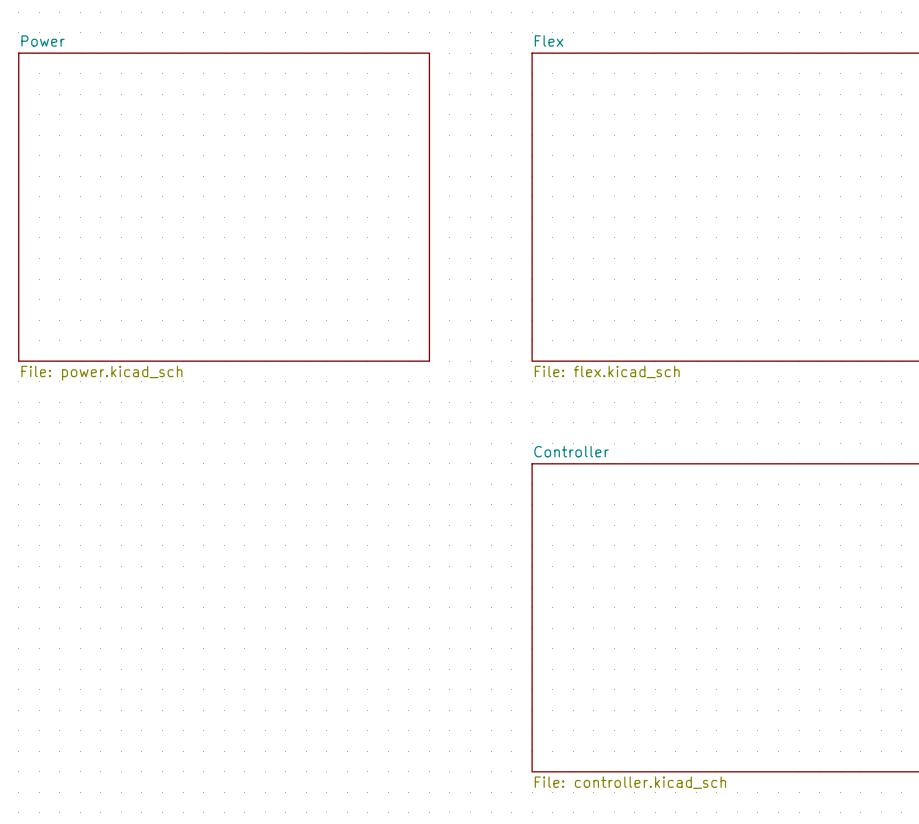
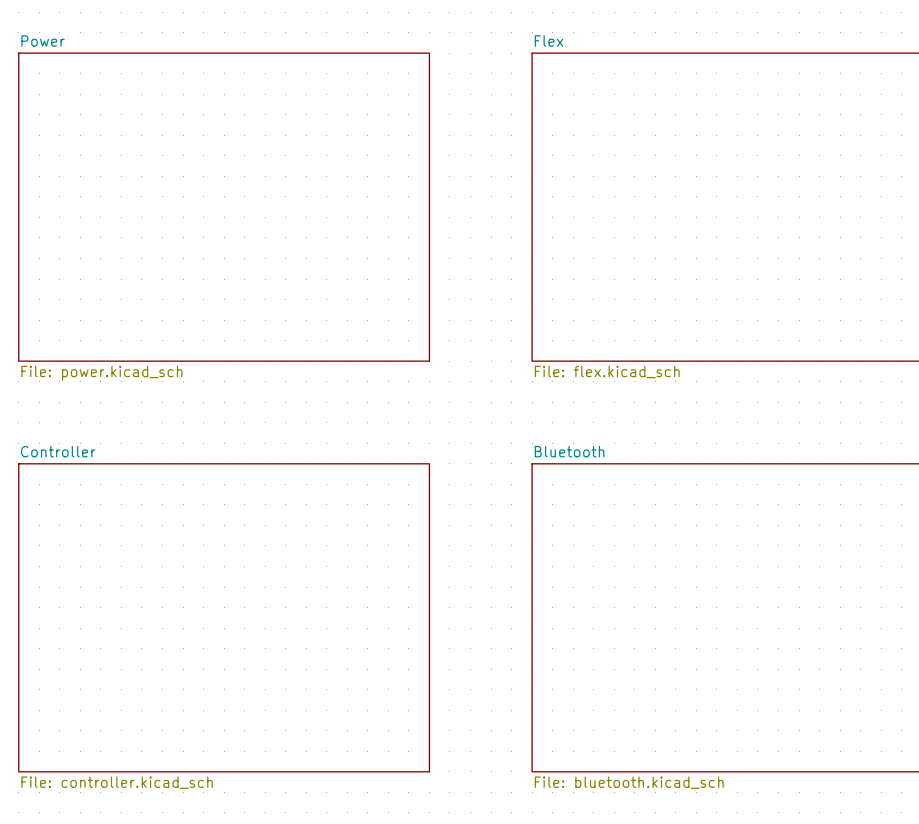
sheet Controller name: Controller (571, 451) -> Bluetooth (569, 451)
sheet Controller: none -> File: controller.kicad_sch (224, 617)
sheet Controller value: File: controller.kicad_sch (630, 782) -> File: bluetooth.kicad_sch (629, 782)

